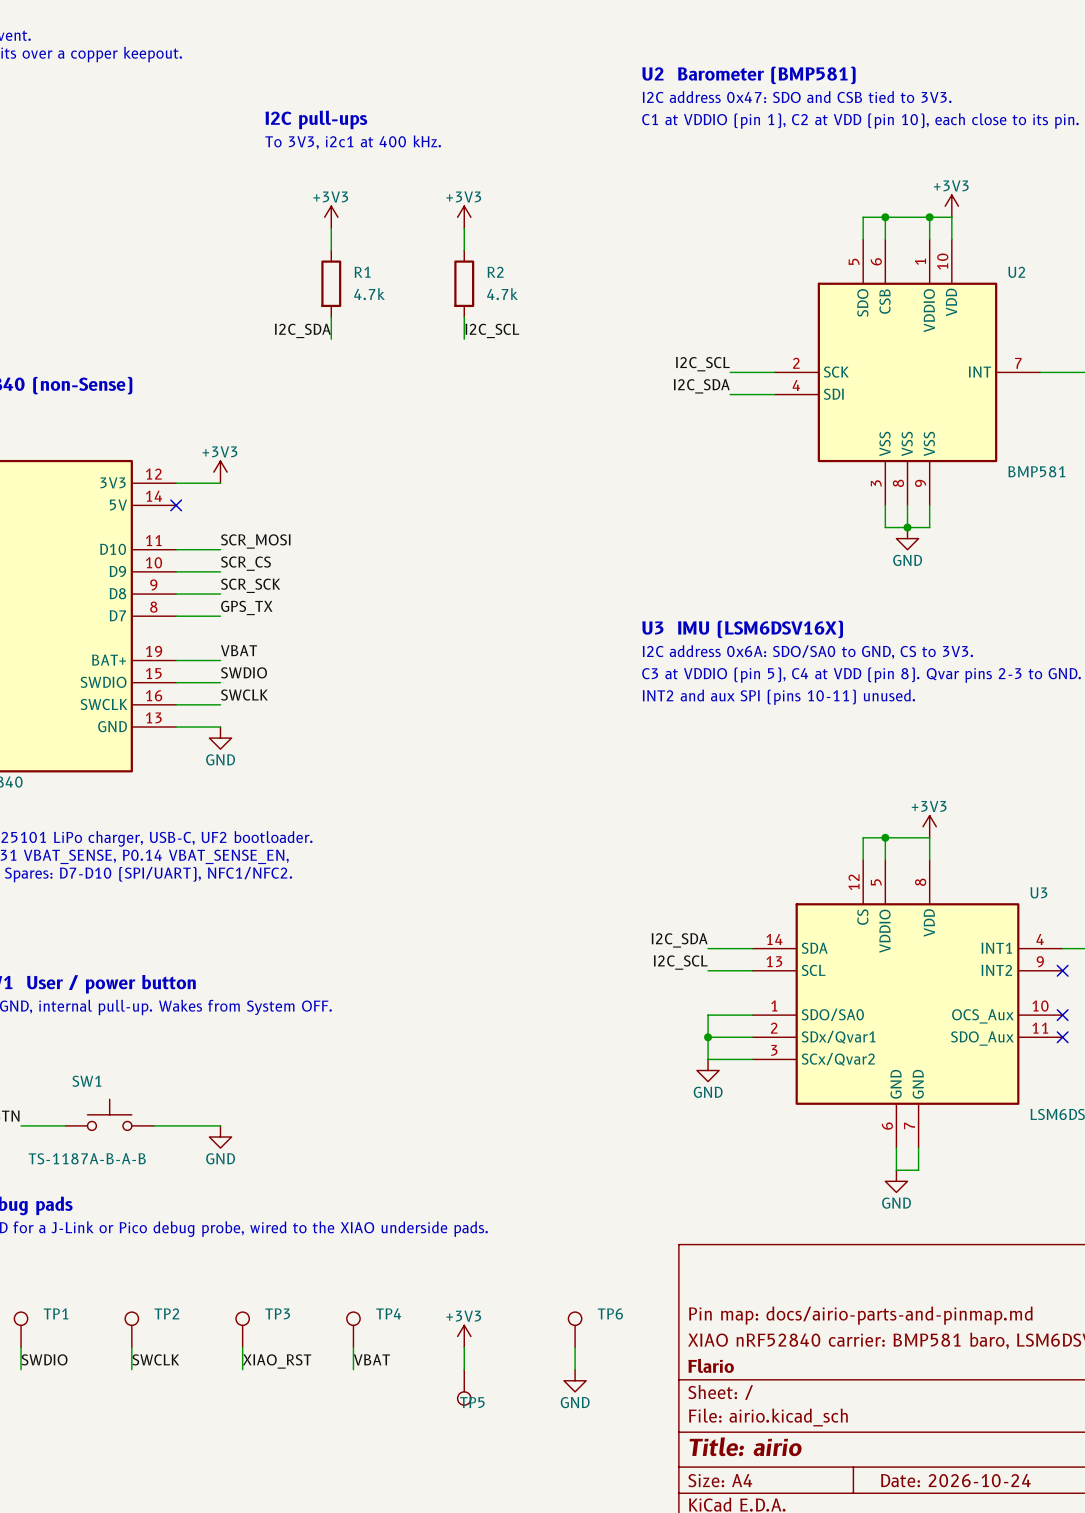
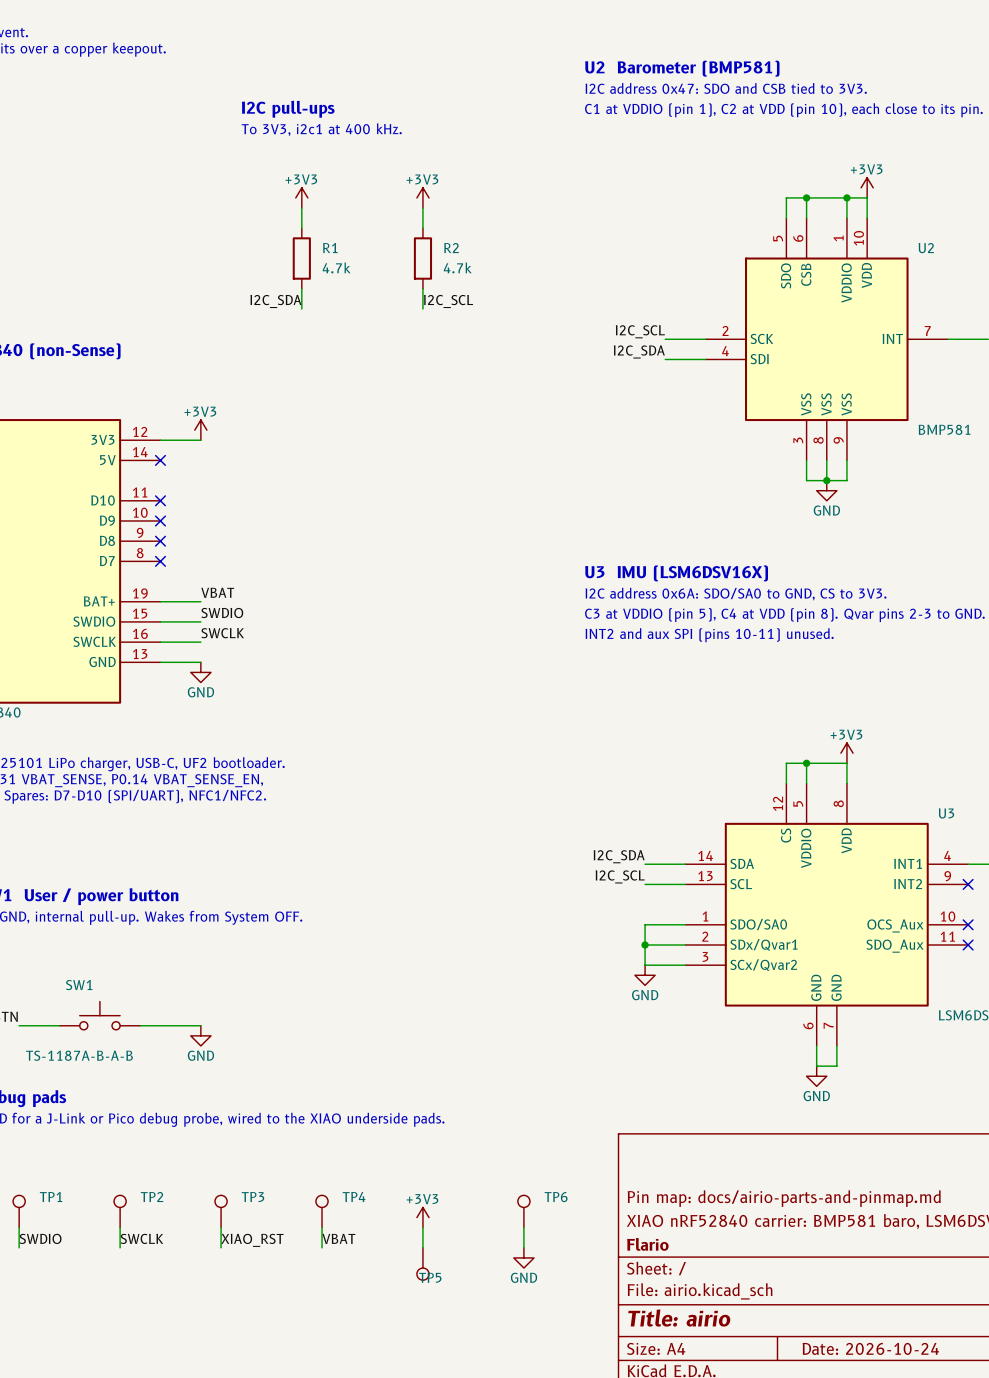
label: SCR_MOSI (255, 541) -> none
wire: (176, 549) (220, 549) -> none
no-connect mark: none -> (160, 500)
label: SCR_CS (245, 563) -> none
wire: (176, 571) (220, 571) -> none
no-connect mark: none -> (160, 520)
label: SCR_SCK (250, 585) -> none
wire: (176, 594) (220, 594) -> none
no-connect mark: none -> (160, 541)
label: GPS_TX (246, 607) -> none
wire: (176, 616) (220, 616) -> none
no-connect mark: none -> (160, 561)

